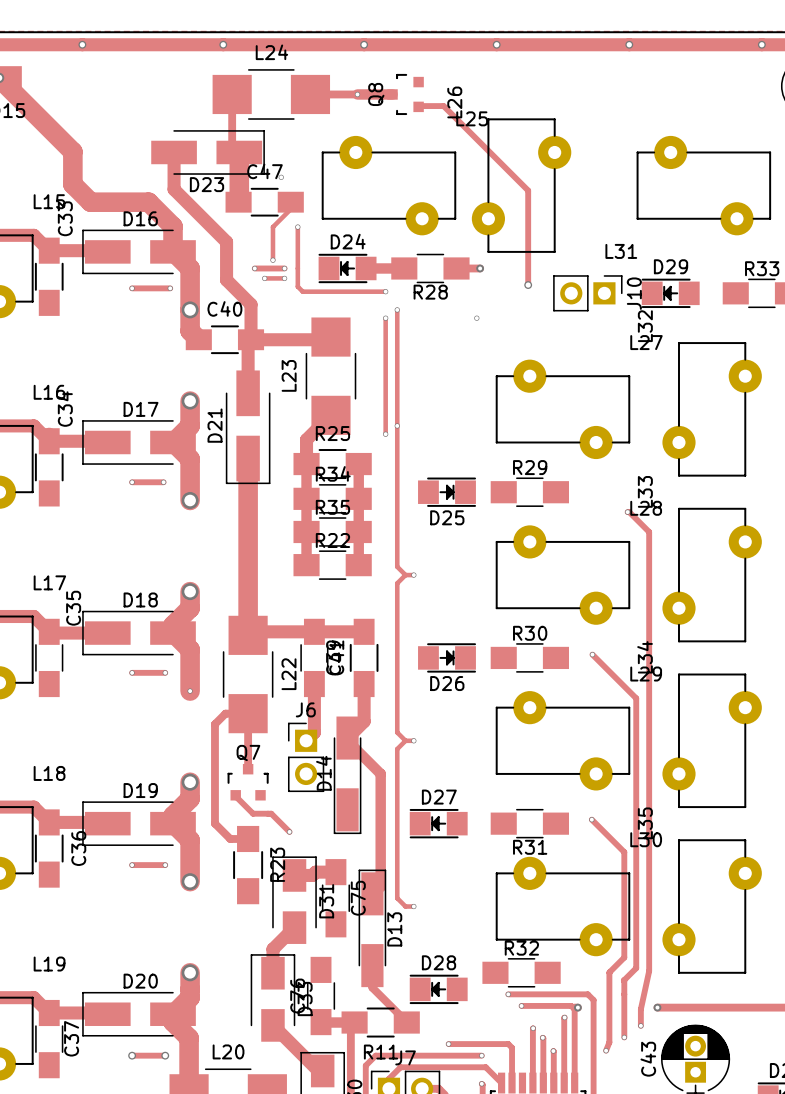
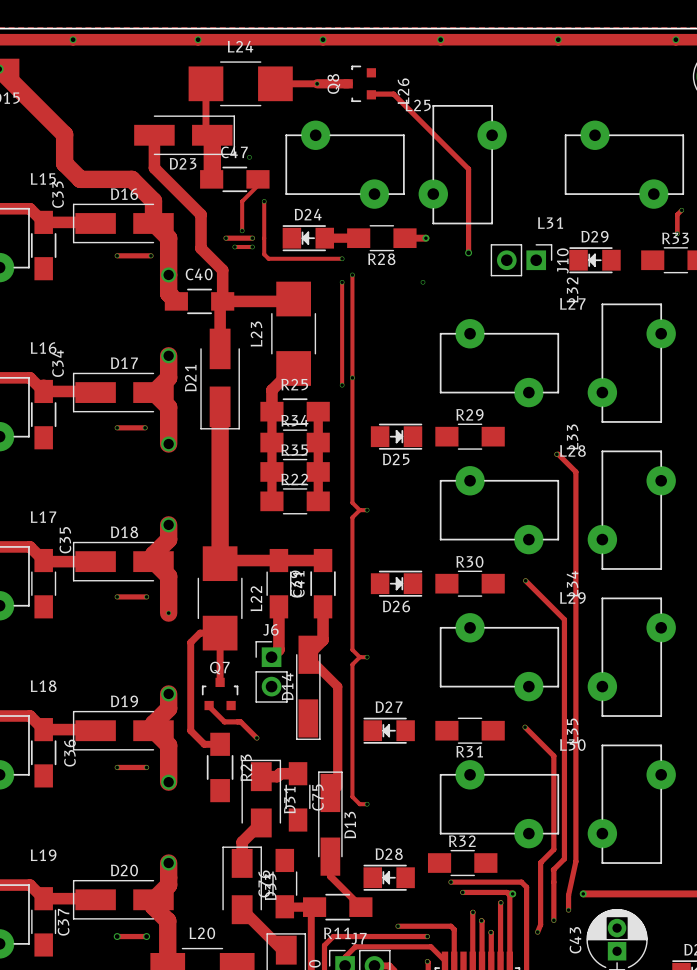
track: none -> (681, 210) (677, 214) (677, 233)
via: none -> (681, 210)
via: none -> (677, 233)

